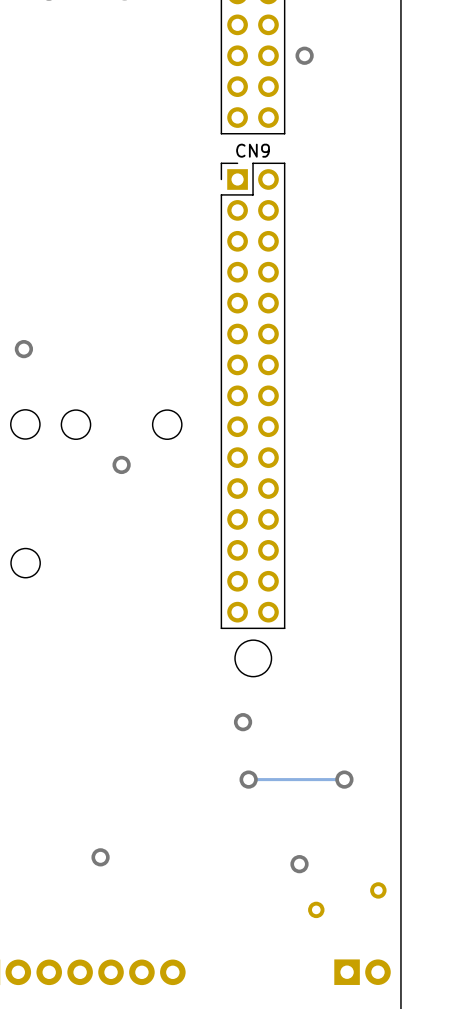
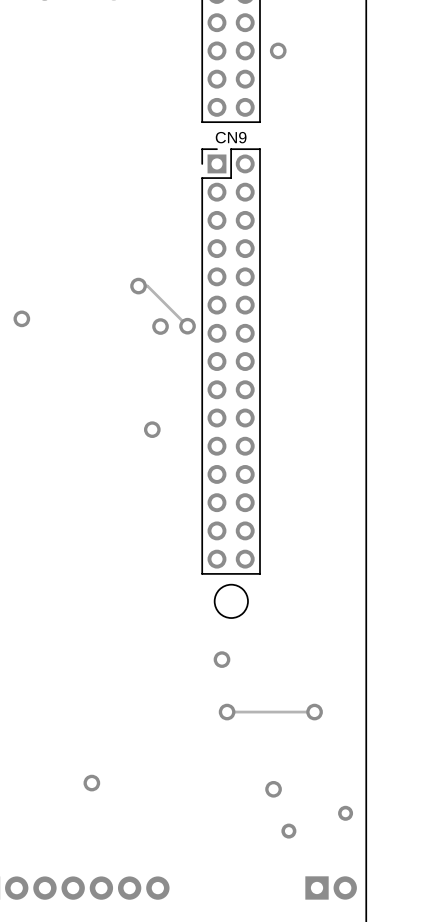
track: none -> (138, 286) (147, 286) (187, 326)
via: none -> (138, 286)
via: none -> (160, 326)
via: none -> (187, 326)
round board edge: [10, 409, 41, 440] -> none
round board edge: [60, 409, 92, 440] -> none
round board edge: [152, 409, 183, 440] -> none
via position: (121, 464) -> (152, 429)
round board edge: [10, 547, 41, 579] -> none

